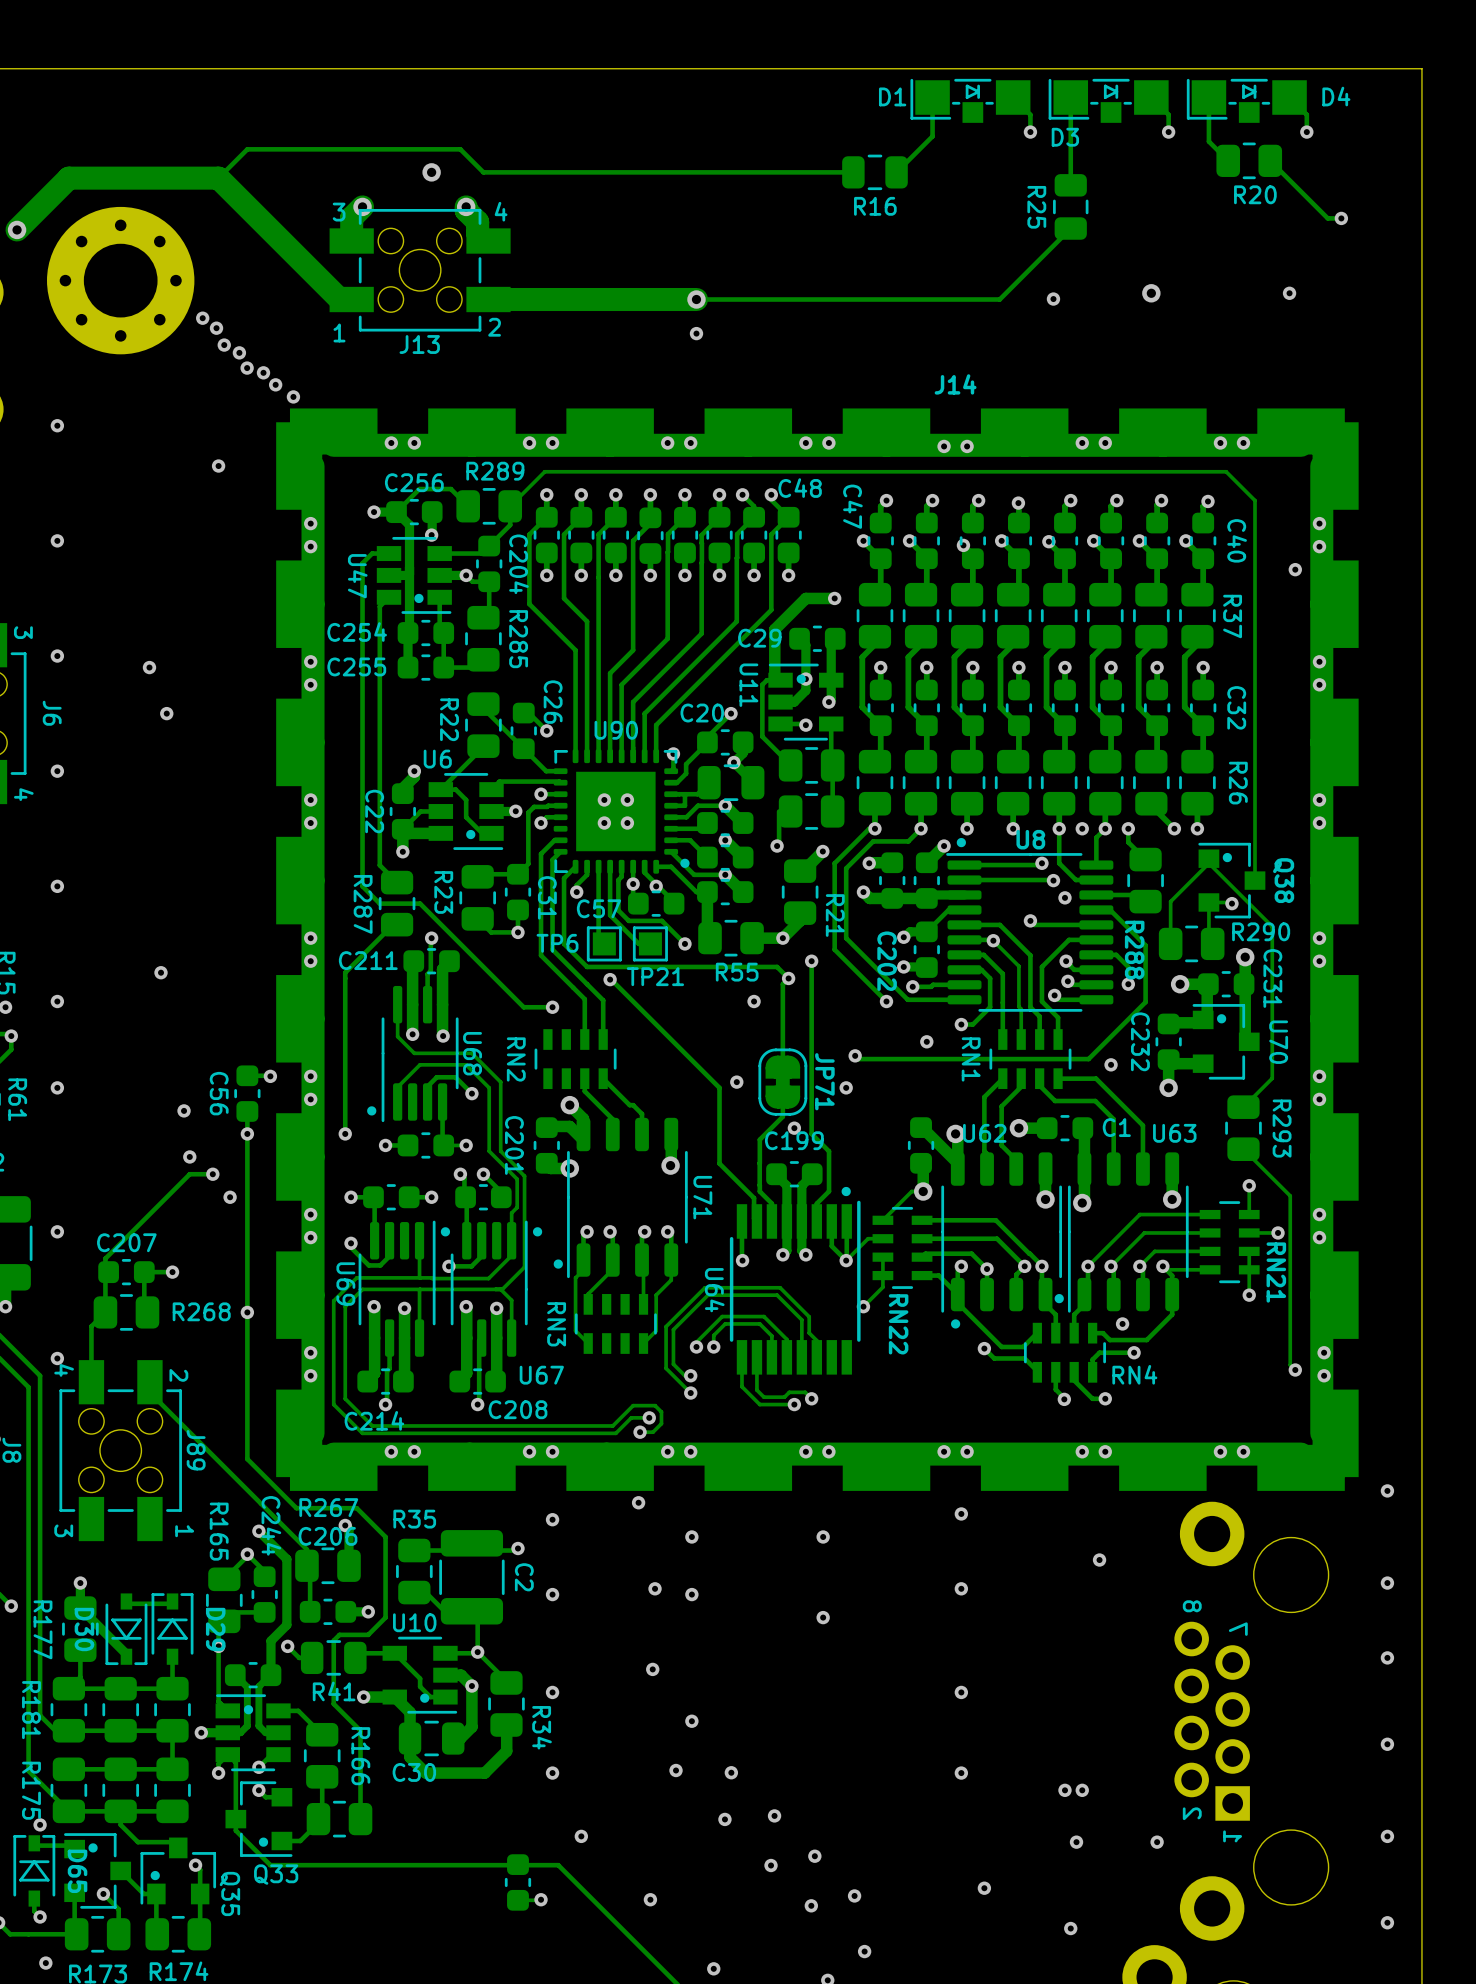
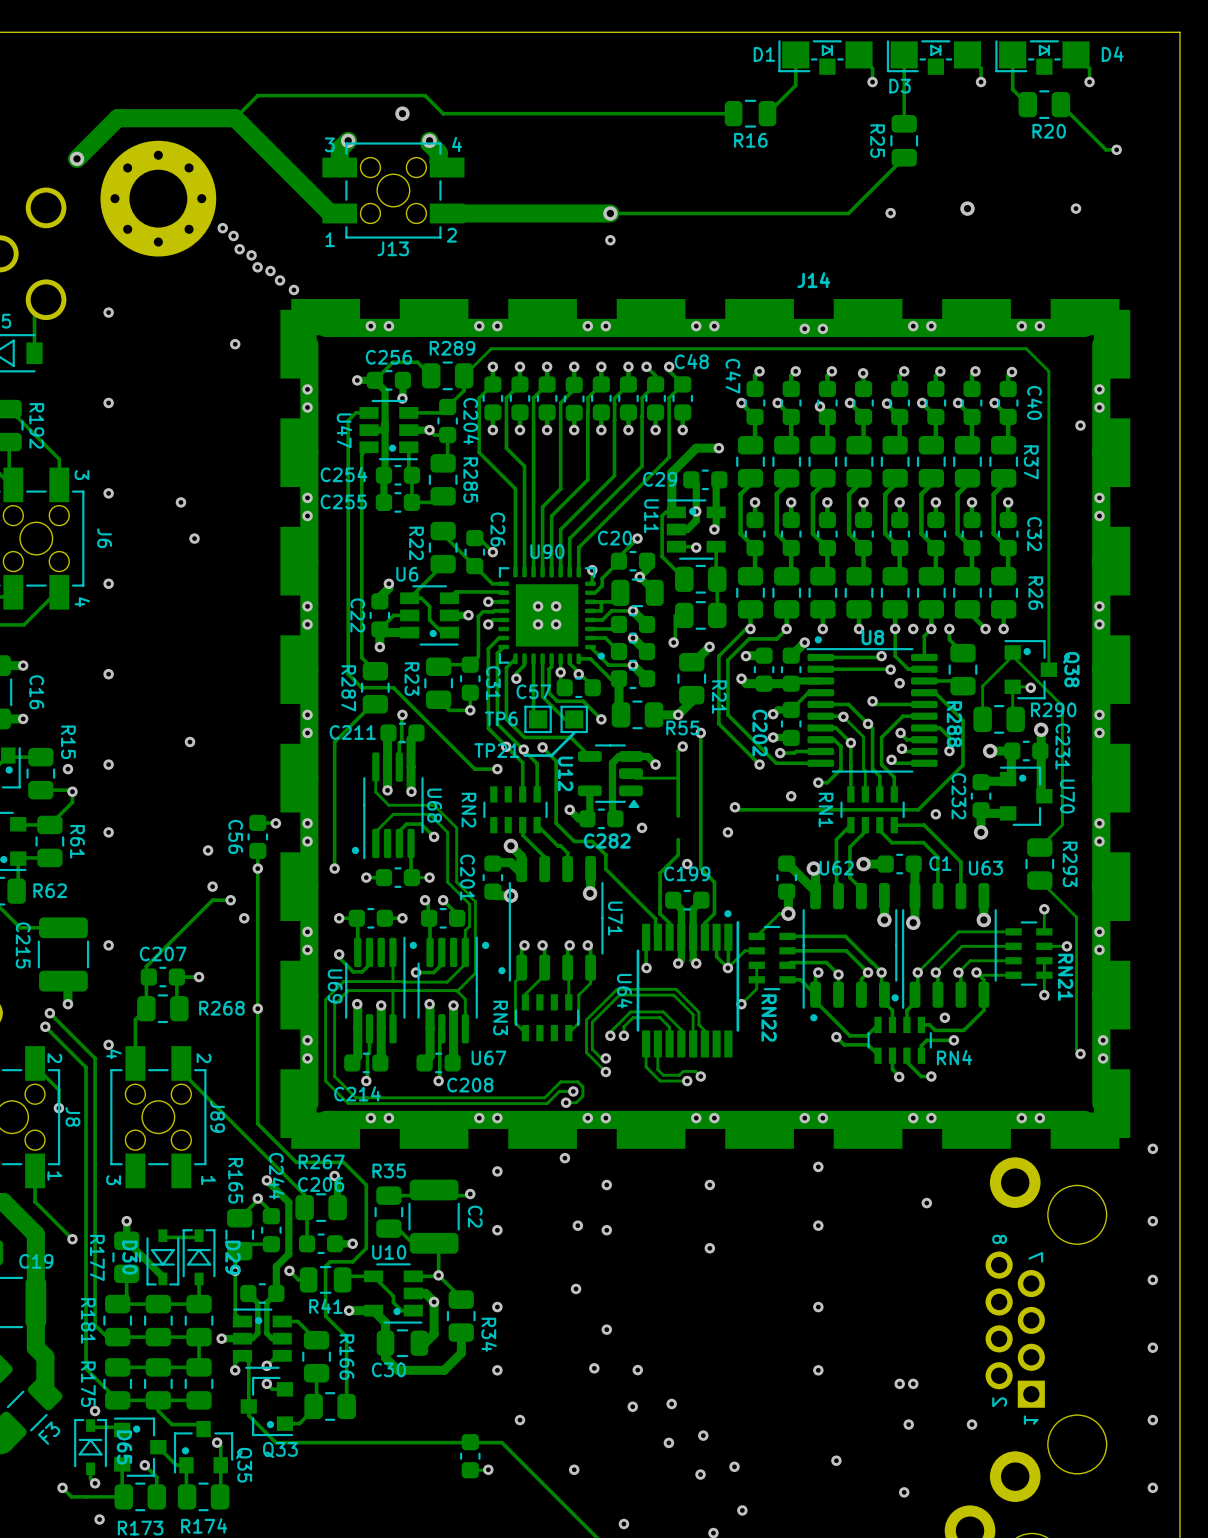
via: none -> (868, 723)
line: none -> (574, 732) (551, 755) (524, 755)
track: (646, 966) (777, 966) (788, 978) -> (570, 737) (589, 756)
R55 name position: R55 (737, 972) -> R55 (683, 727)
via: none -> (850, 742)
TP21 name position: TP21 (655, 976) -> TP21 (496, 750)
via: none -> (506, 746)
track: (610, 979) (719, 1087) (719, 1163) -> (542, 747) (556, 760) (556, 823) (574, 841) (592, 841) (605, 855) (605, 869) (628, 891)
via: none -> (523, 749)
track: none -> (655, 764) (647, 756) (618, 756) (612, 762) (612, 815) (615, 818)
track: none -> (630, 773) (635, 778) (678, 778)
U12: none -> (610, 776)
track: none -> (589, 790) (589, 816) (587, 818) (578, 818) (569, 809)
via: none -> (569, 809)
C282: none -> (601, 818)
JP71: (782, 1082) -> none

